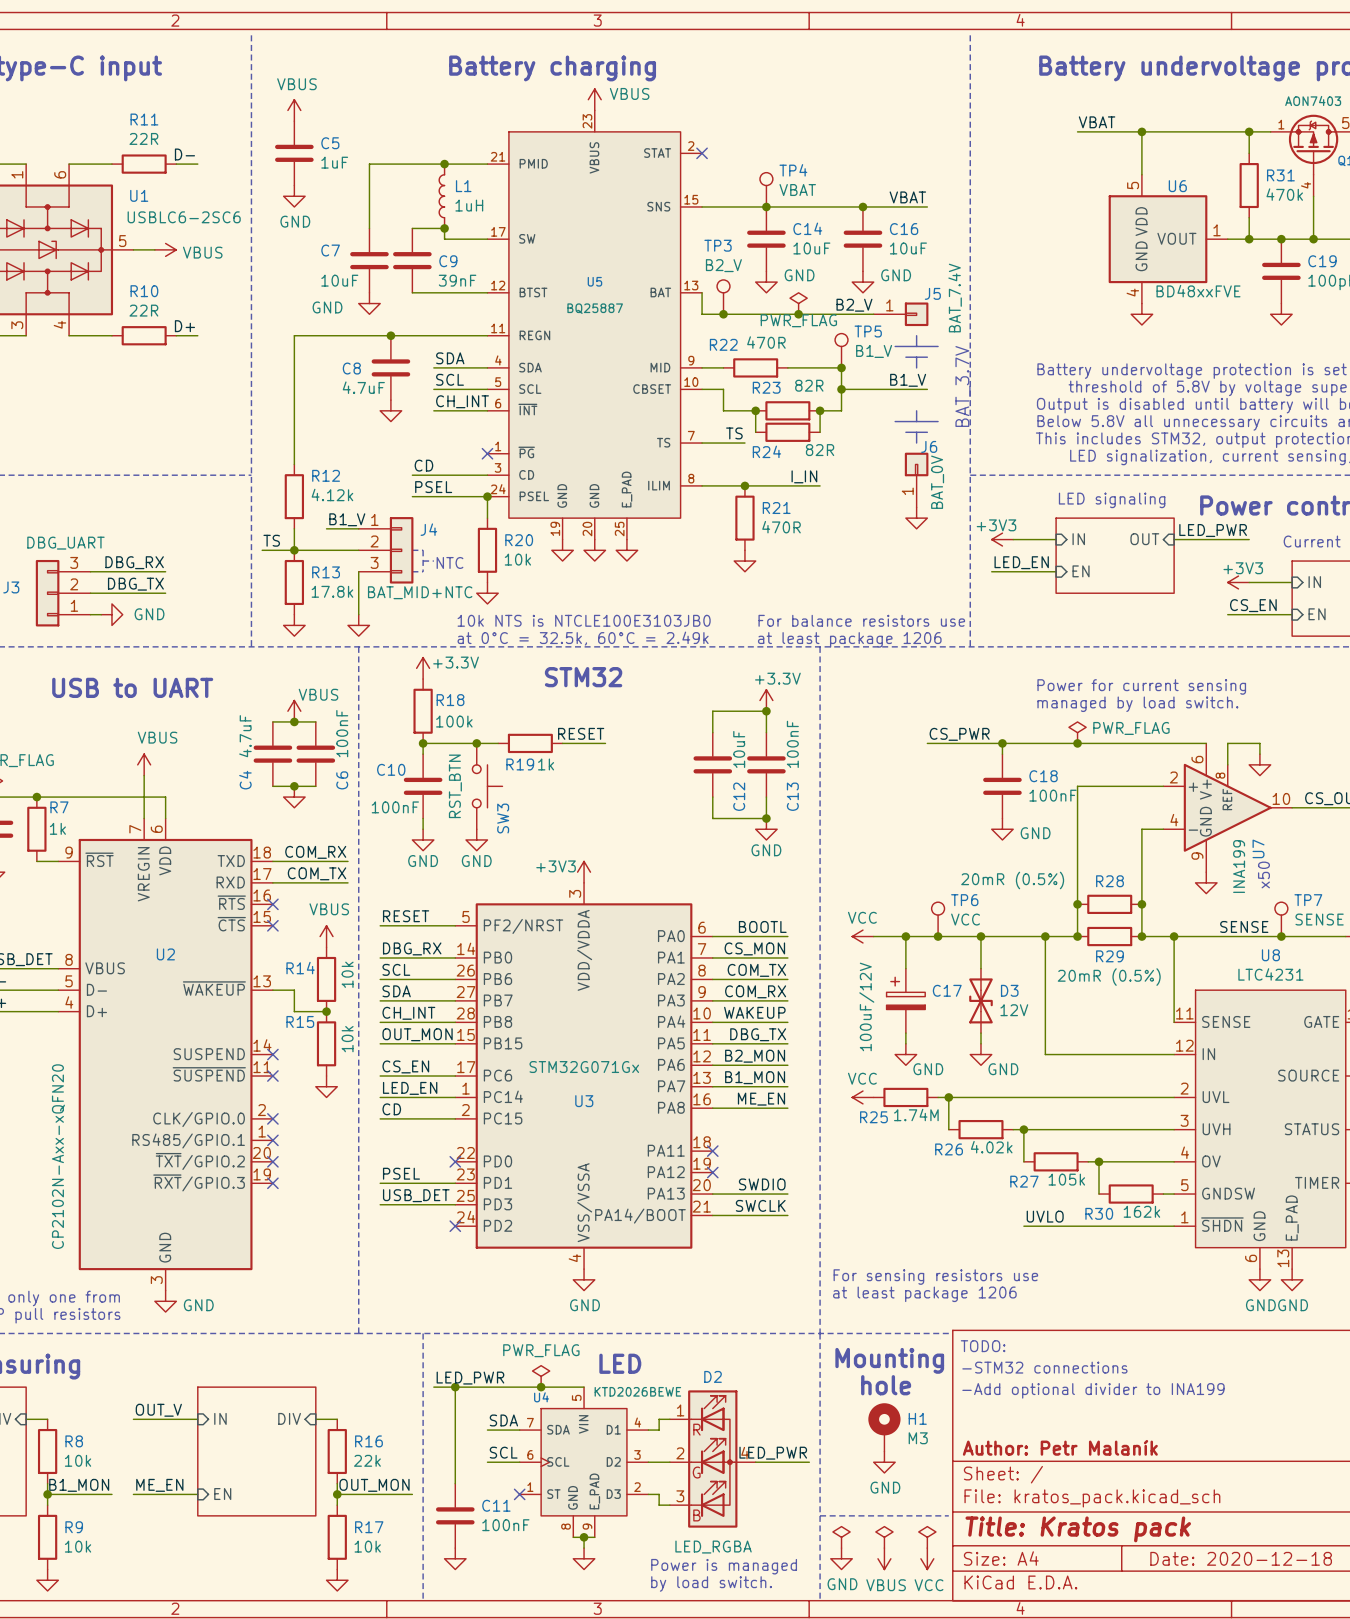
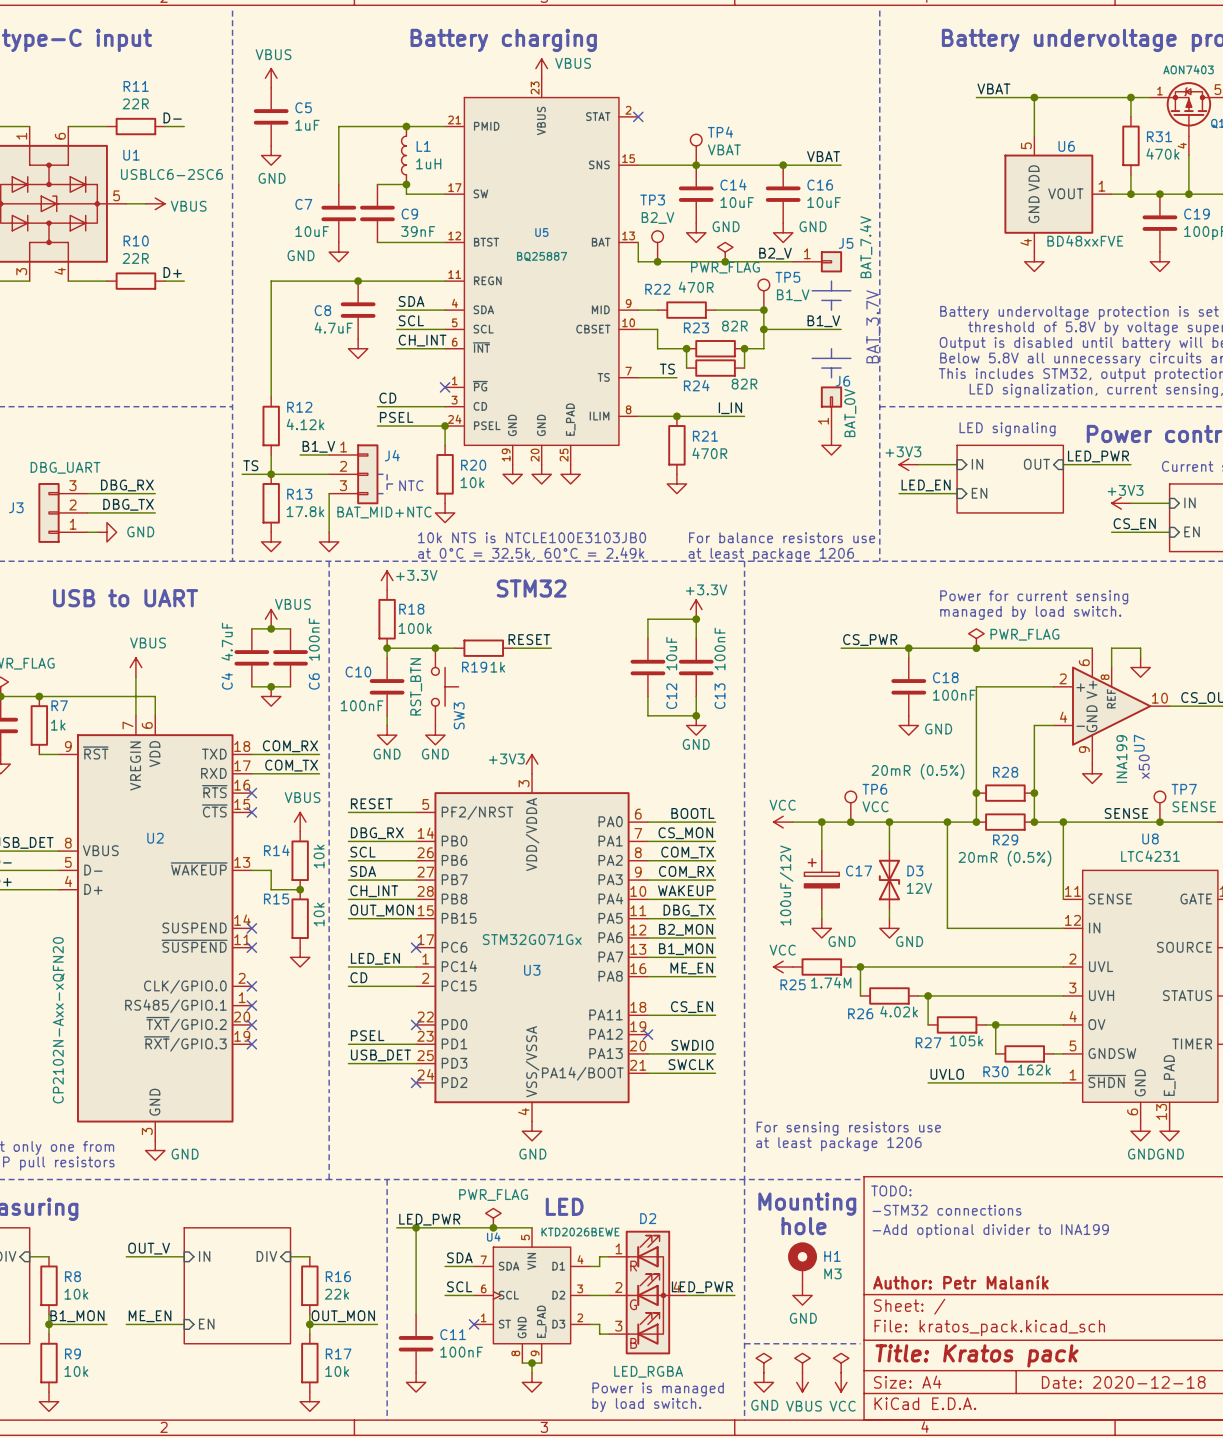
label: CS_EN (405, 1066) -> none
wire: (380, 1076) (455, 1076) -> none
no-connect mark: none -> (416, 947)
label: none -> CS_EN (692, 1007)
wire: none -> (647, 1015) (715, 1015)
no-connect mark: (712, 1151) -> none

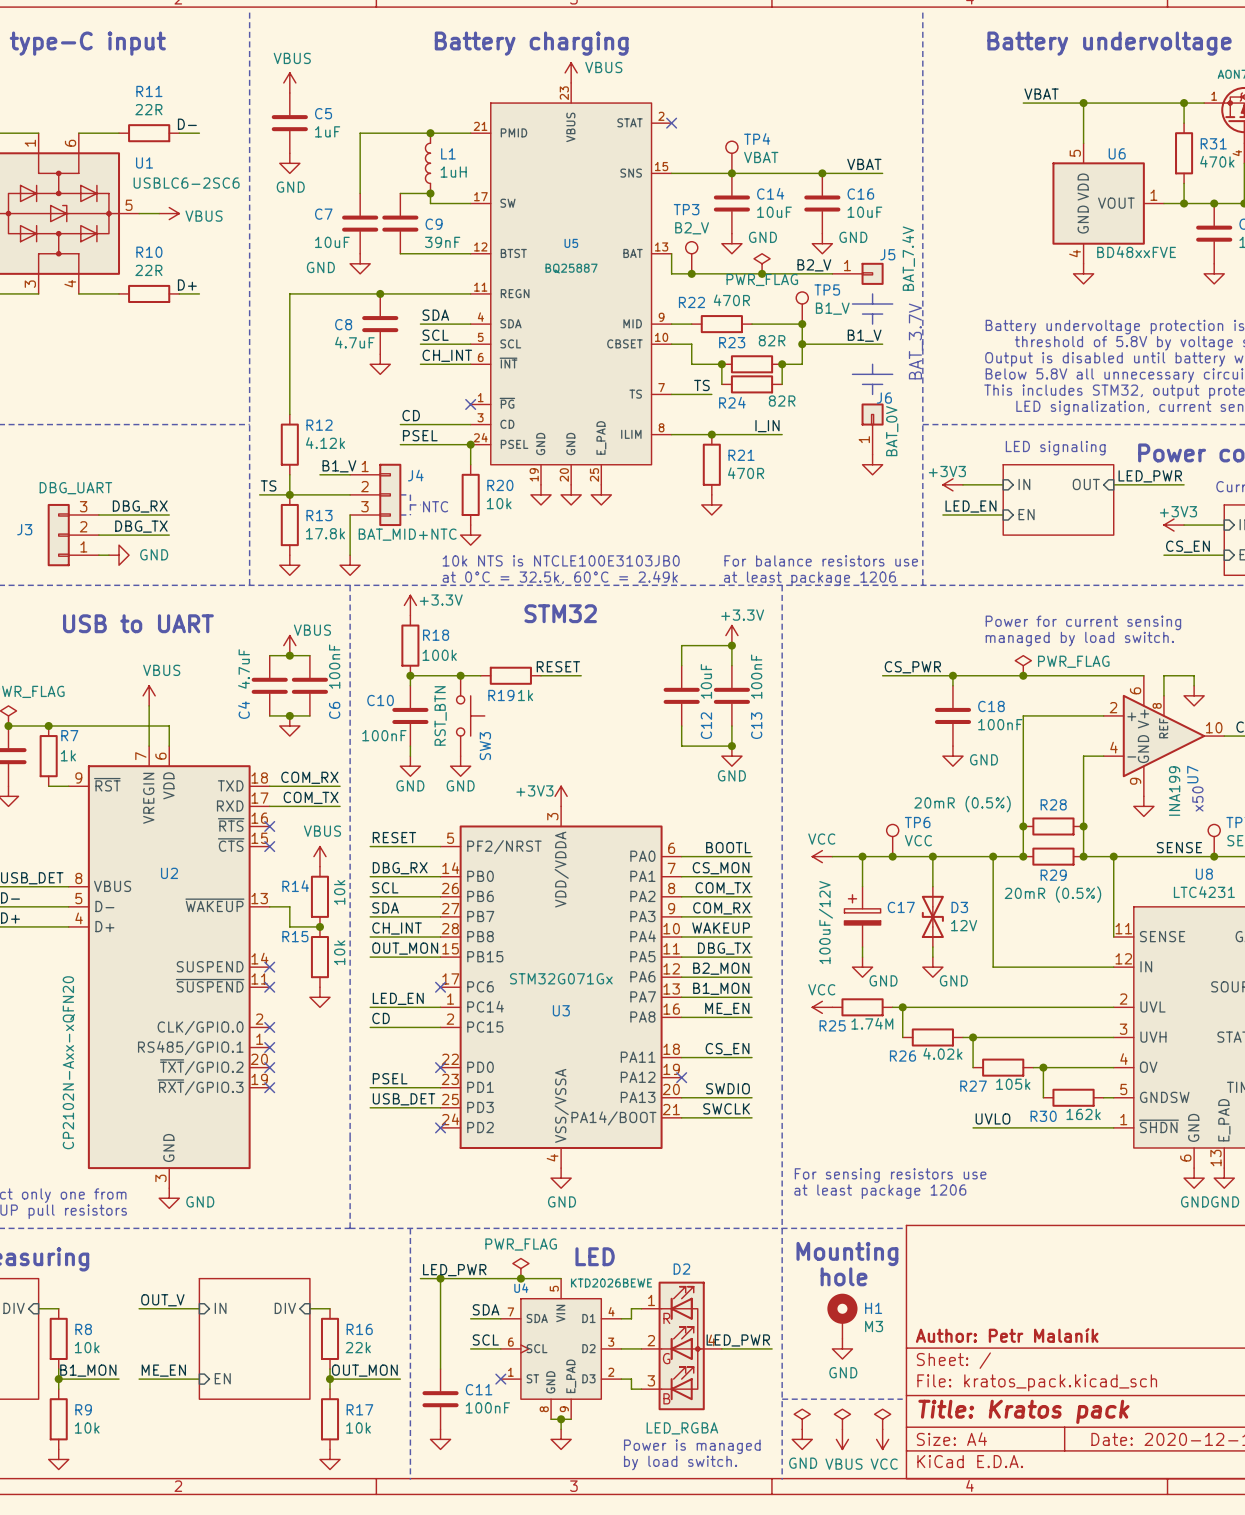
text: TODO: (891, 1190) -> none
text: -STM32 connections (947, 1210) -> none
text: -Add optional divider to INA199 (990, 1231) -> none

